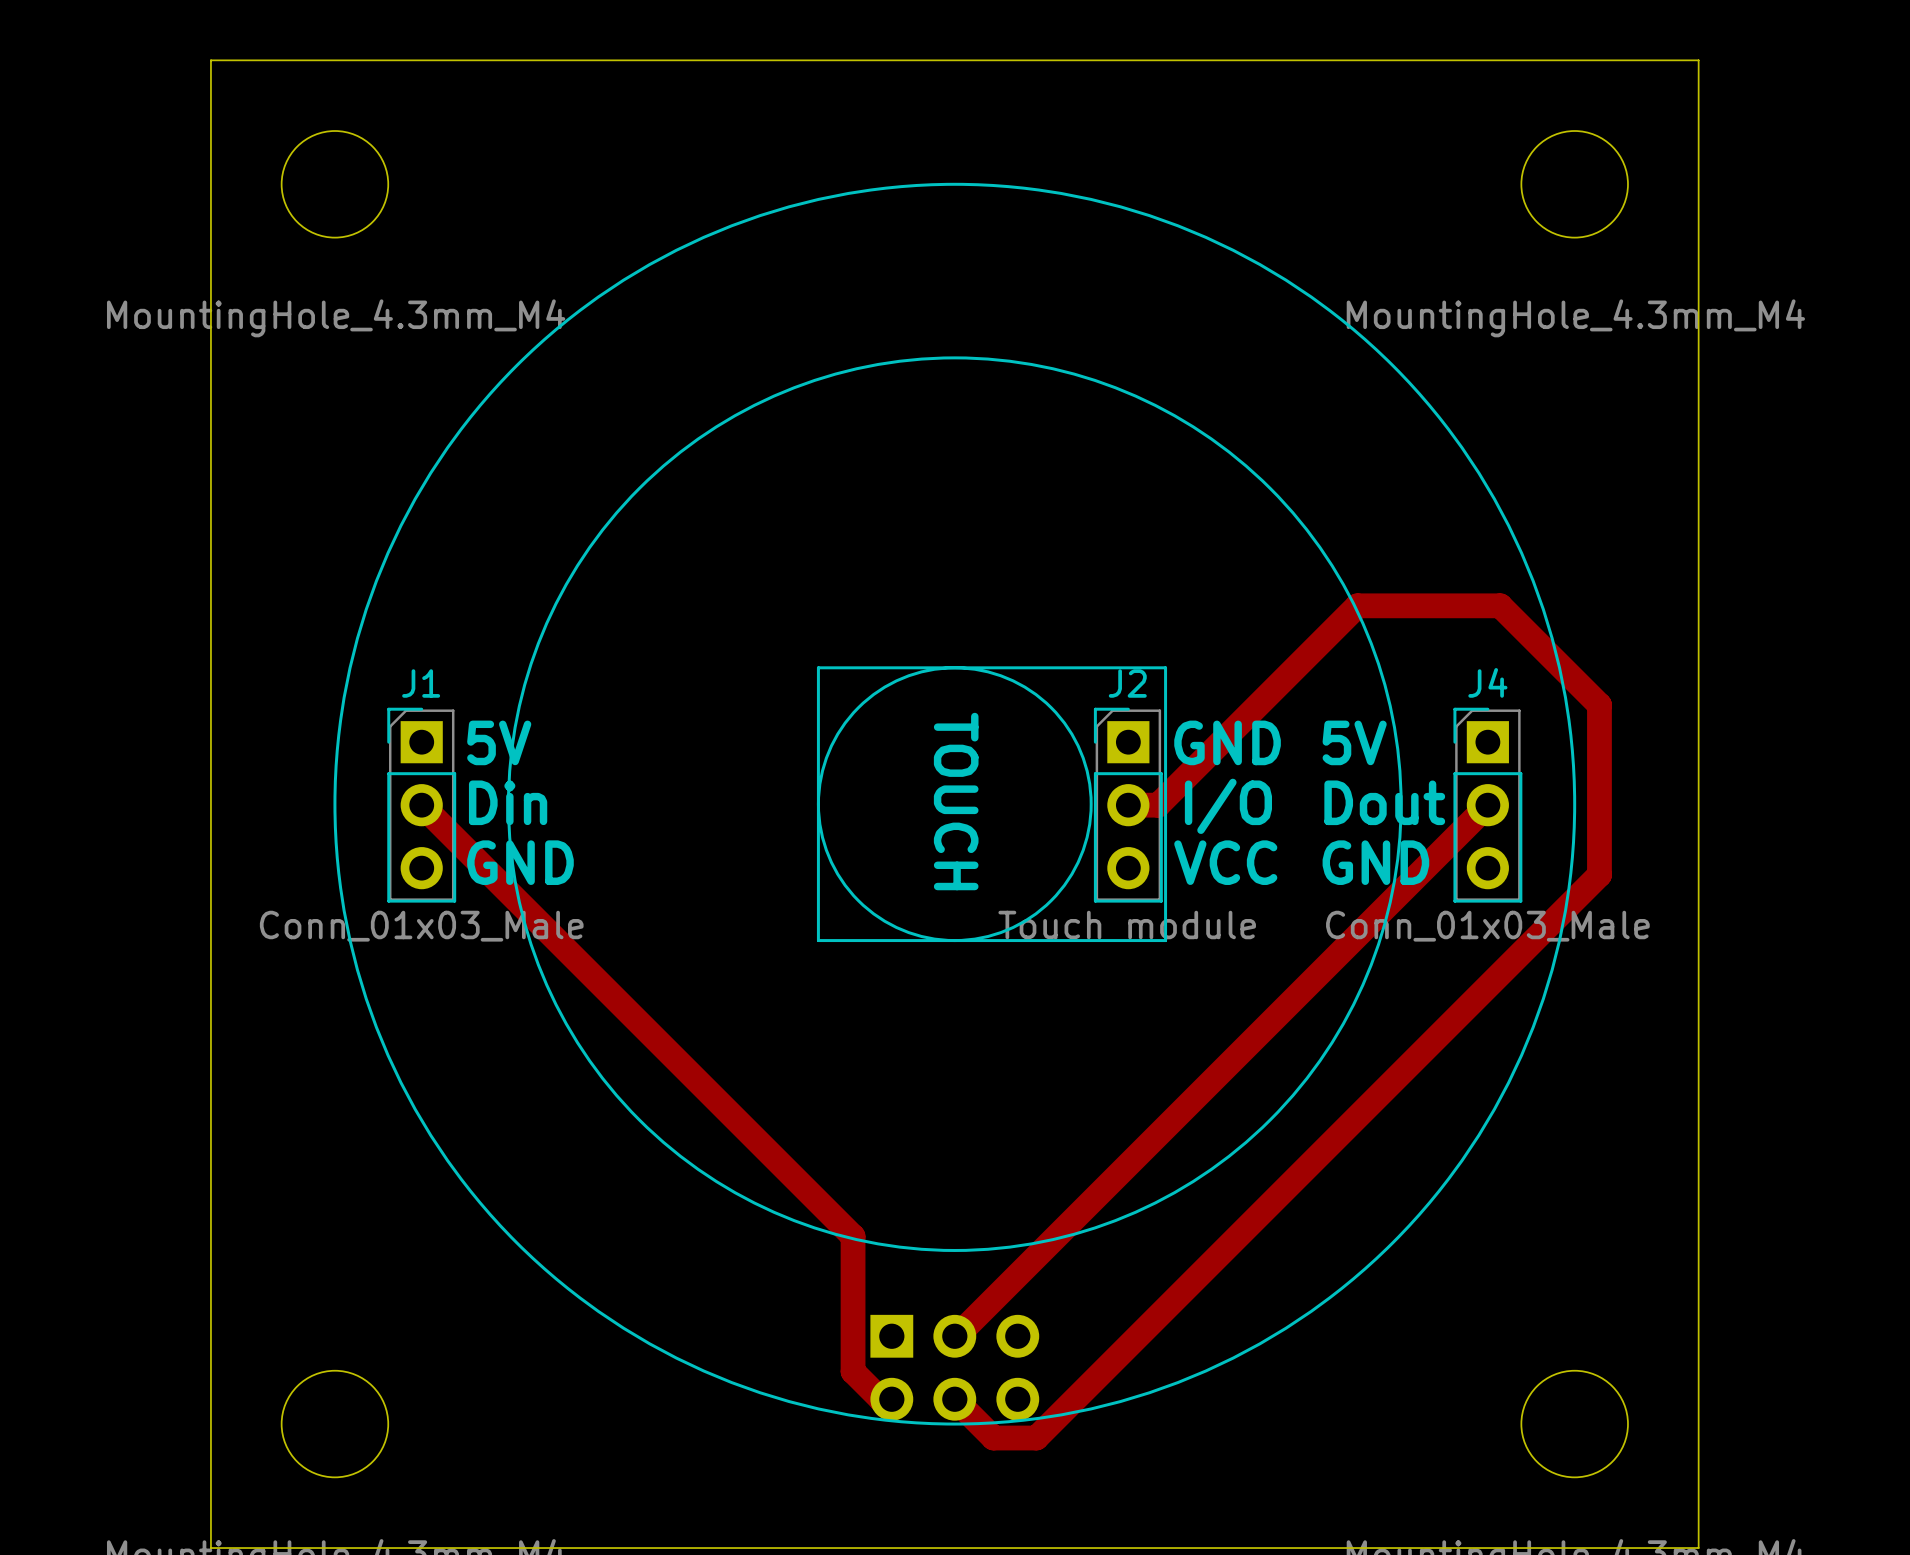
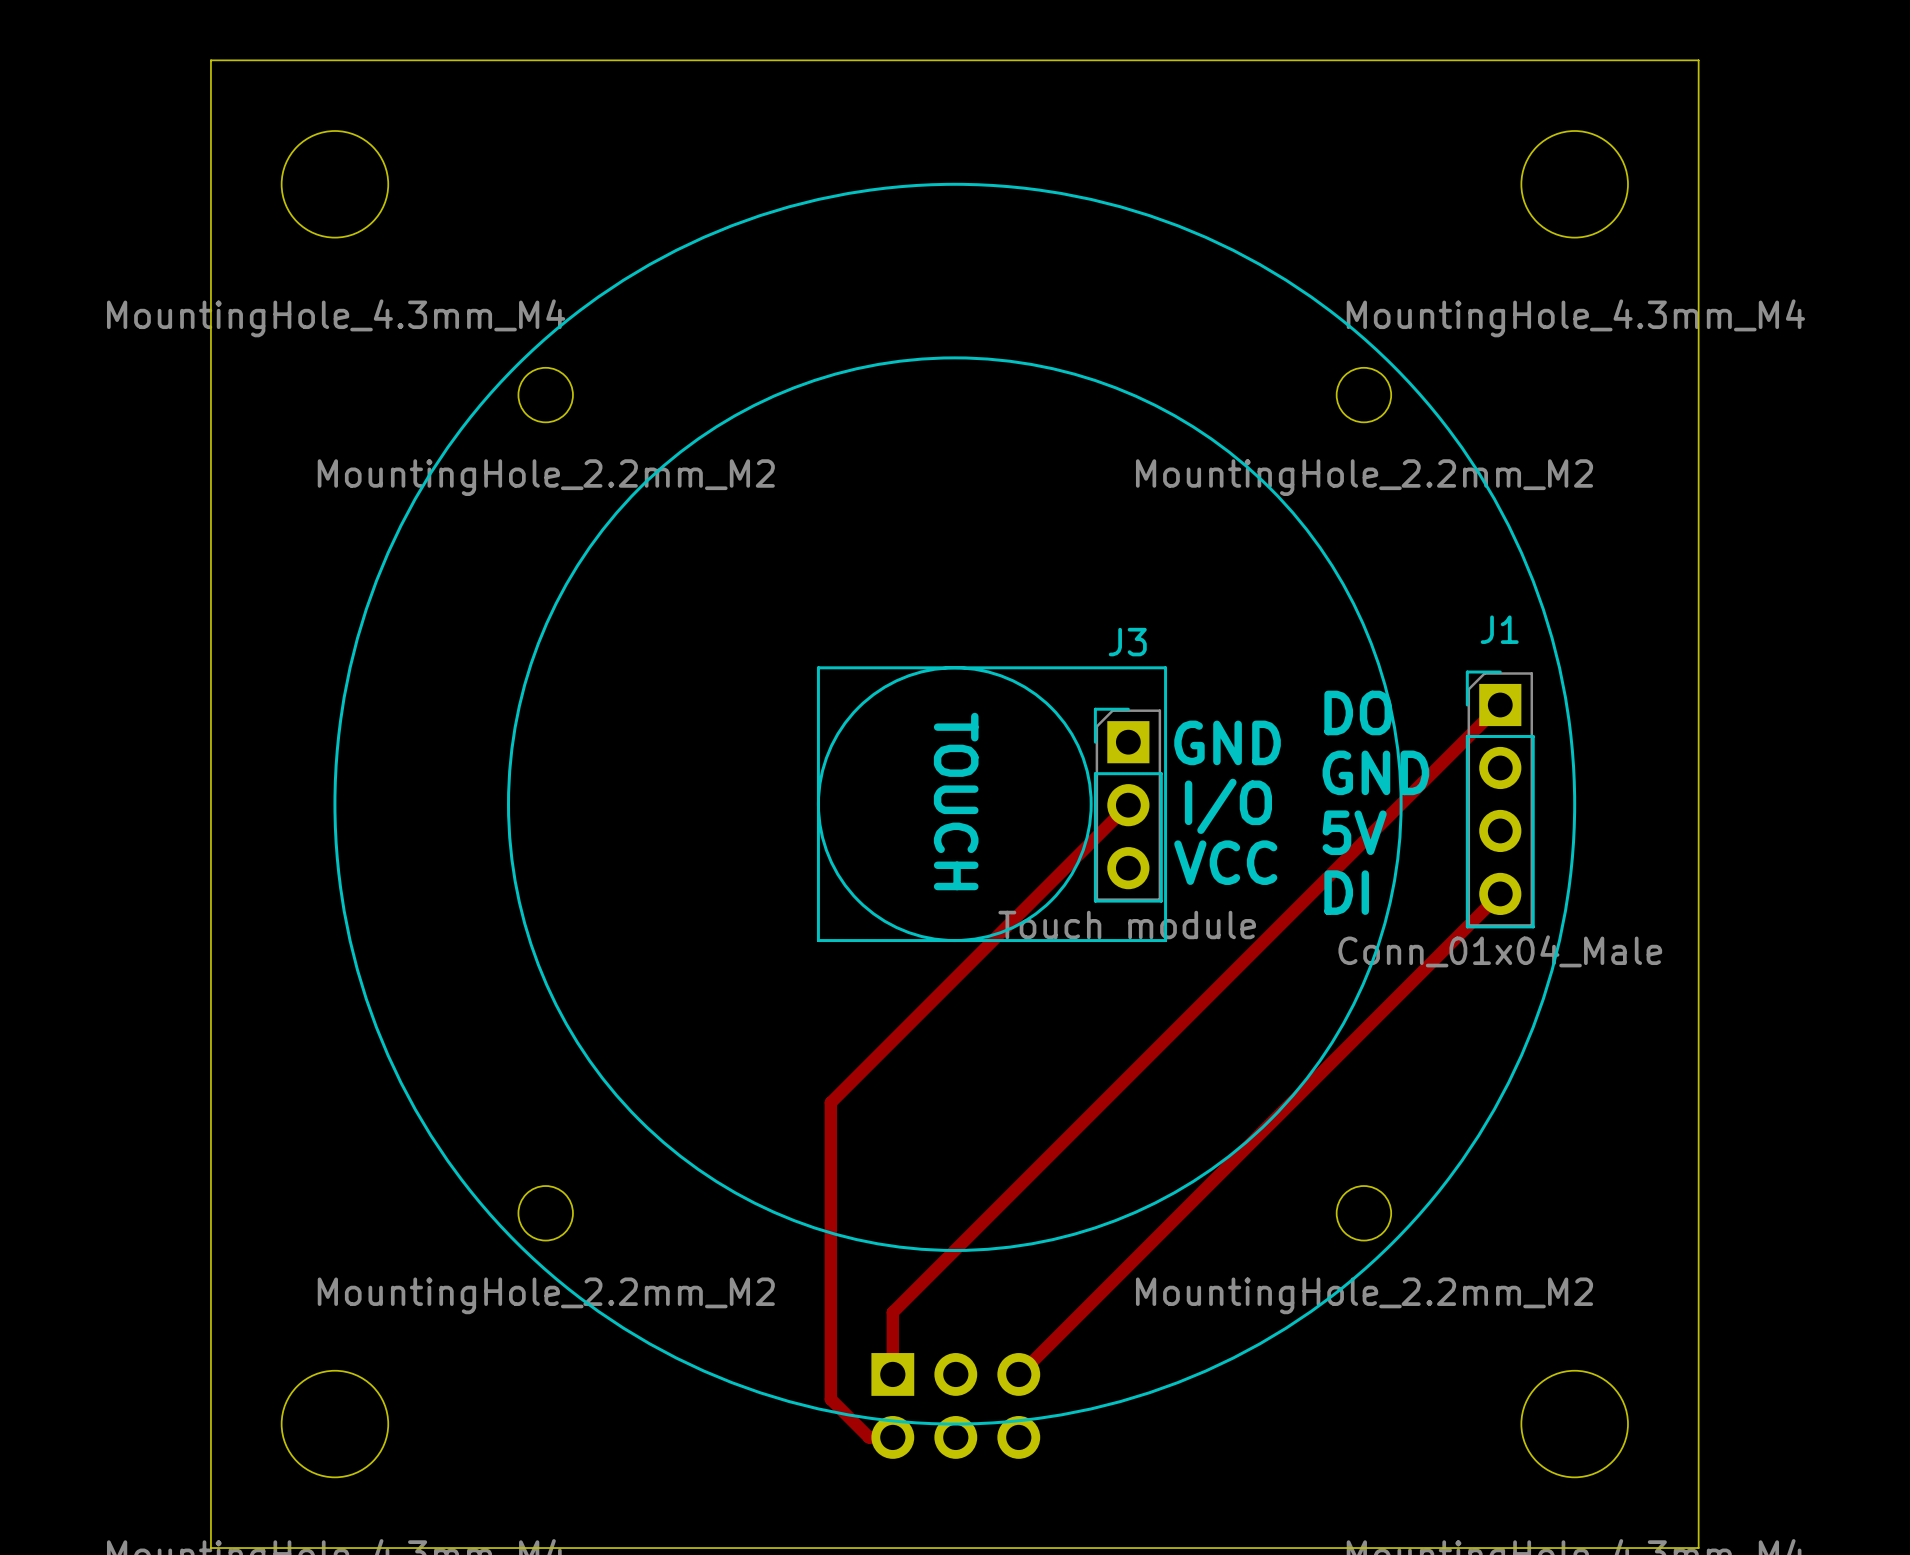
part: none -> MountingHole_2.2mm_M2 (545, 395)
part: none -> MountingHole_2.2mm_M2 (1363, 395)
J2 name: J2 (1127, 683) -> J3 (1127, 642)
track: none -> (1500, 705) (892, 1312) (892, 1374)
J1 footprint: [387, 707, 457, 903] -> [1465, 670, 1535, 929]
text: none -> DO (1358, 712)
text: 5V (499, 742) -> none
text position: 5V (1354, 742) -> 5V (1354, 832)
text: Din (508, 802) -> none
text: Dout (1384, 802) -> none
track: (421, 805) (853, 1236) (853, 1371) (880, 1399) (891, 1399) -> none
track: (1128, 805) (1158, 805) (1357, 605) (1500, 605) (1599, 705) (1599, 874) (1036, 1438) (993, 1438) (954, 1399) -> (1128, 805) (830, 1102) (830, 1399) (869, 1437) (892, 1437)
track: (1487, 805) (954, 1336) -> none
J4: Conn_01x03_Male (1487, 805) -> none
text: GND (520, 862) -> none
text position: GND (1375, 862) -> GND (1375, 772)
text: none -> DI (1346, 892)
track: none -> (1500, 893) (1018, 1374)
J1 value: Conn_01x03_Male (421, 926) -> Conn_01x04_Male (1500, 951)
part: none -> MountingHole_2.2mm_M2 (545, 1213)
part: none -> MountingHole_2.2mm_M2 (1363, 1213)
part position: (954, 1367) -> (955, 1405)

